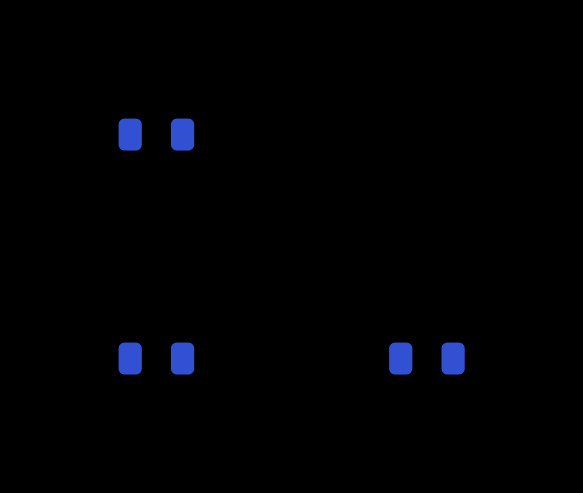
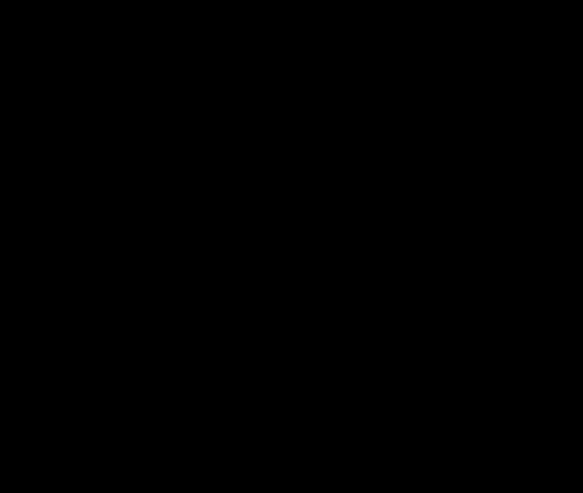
part: (156, 134) -> none
part: (156, 358) -> none
part: (426, 358) -> none

